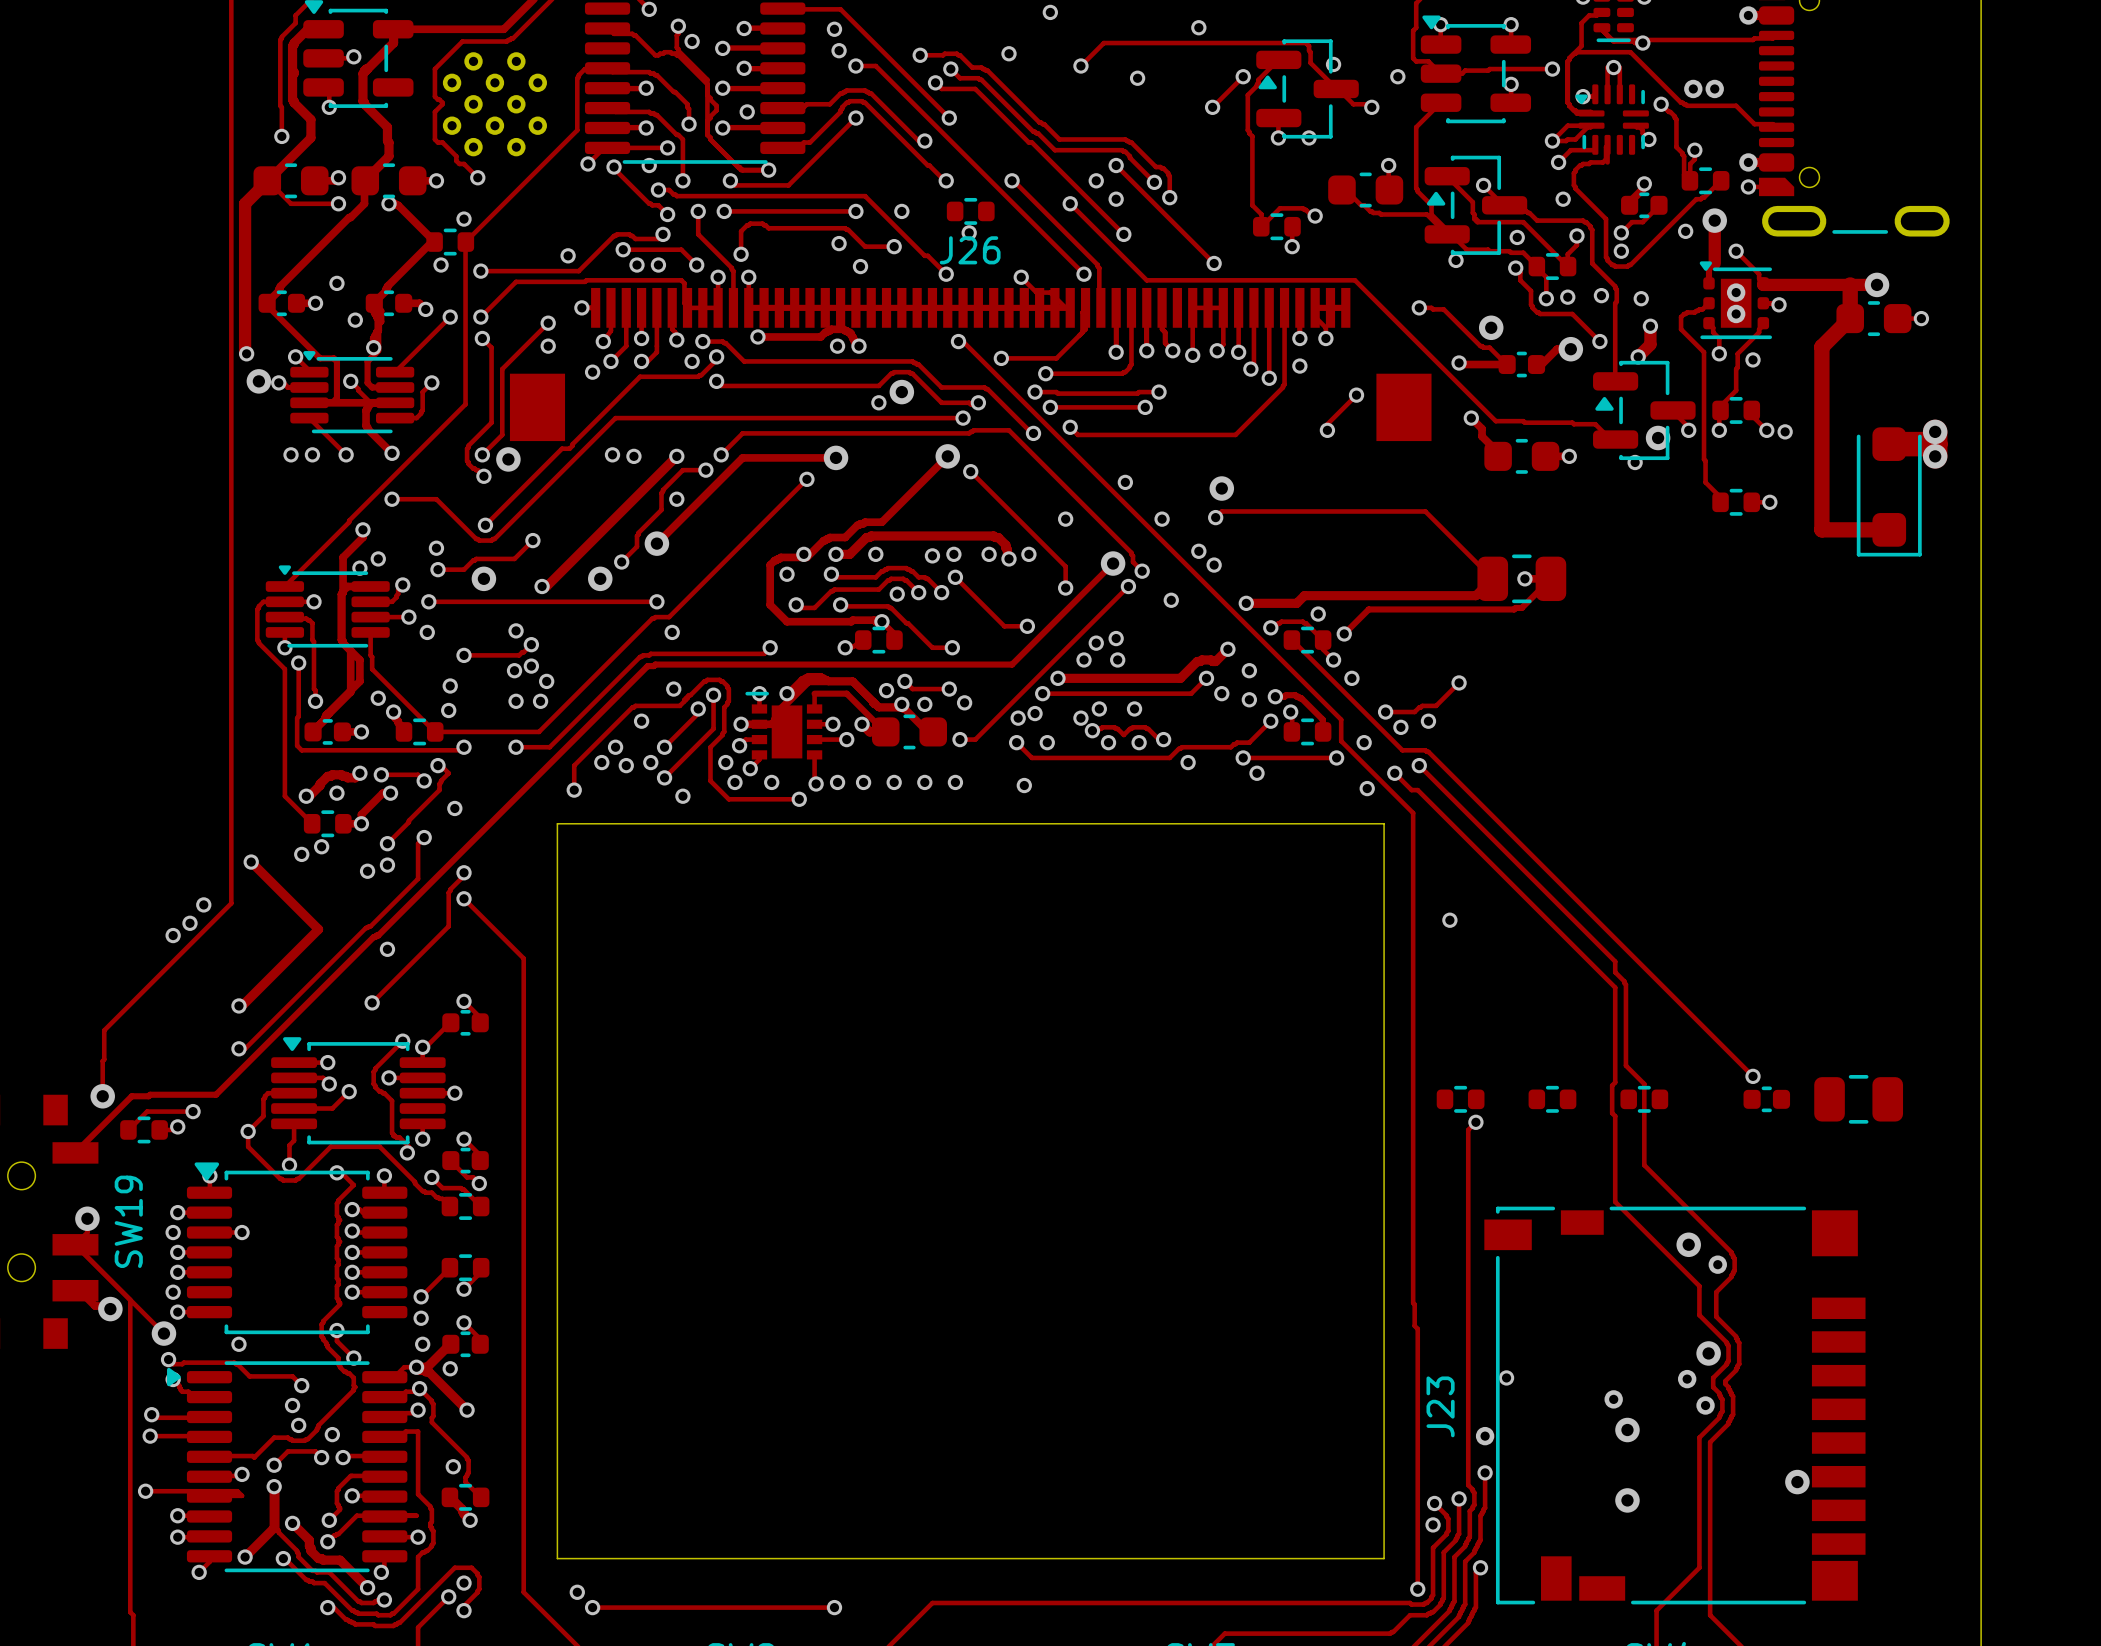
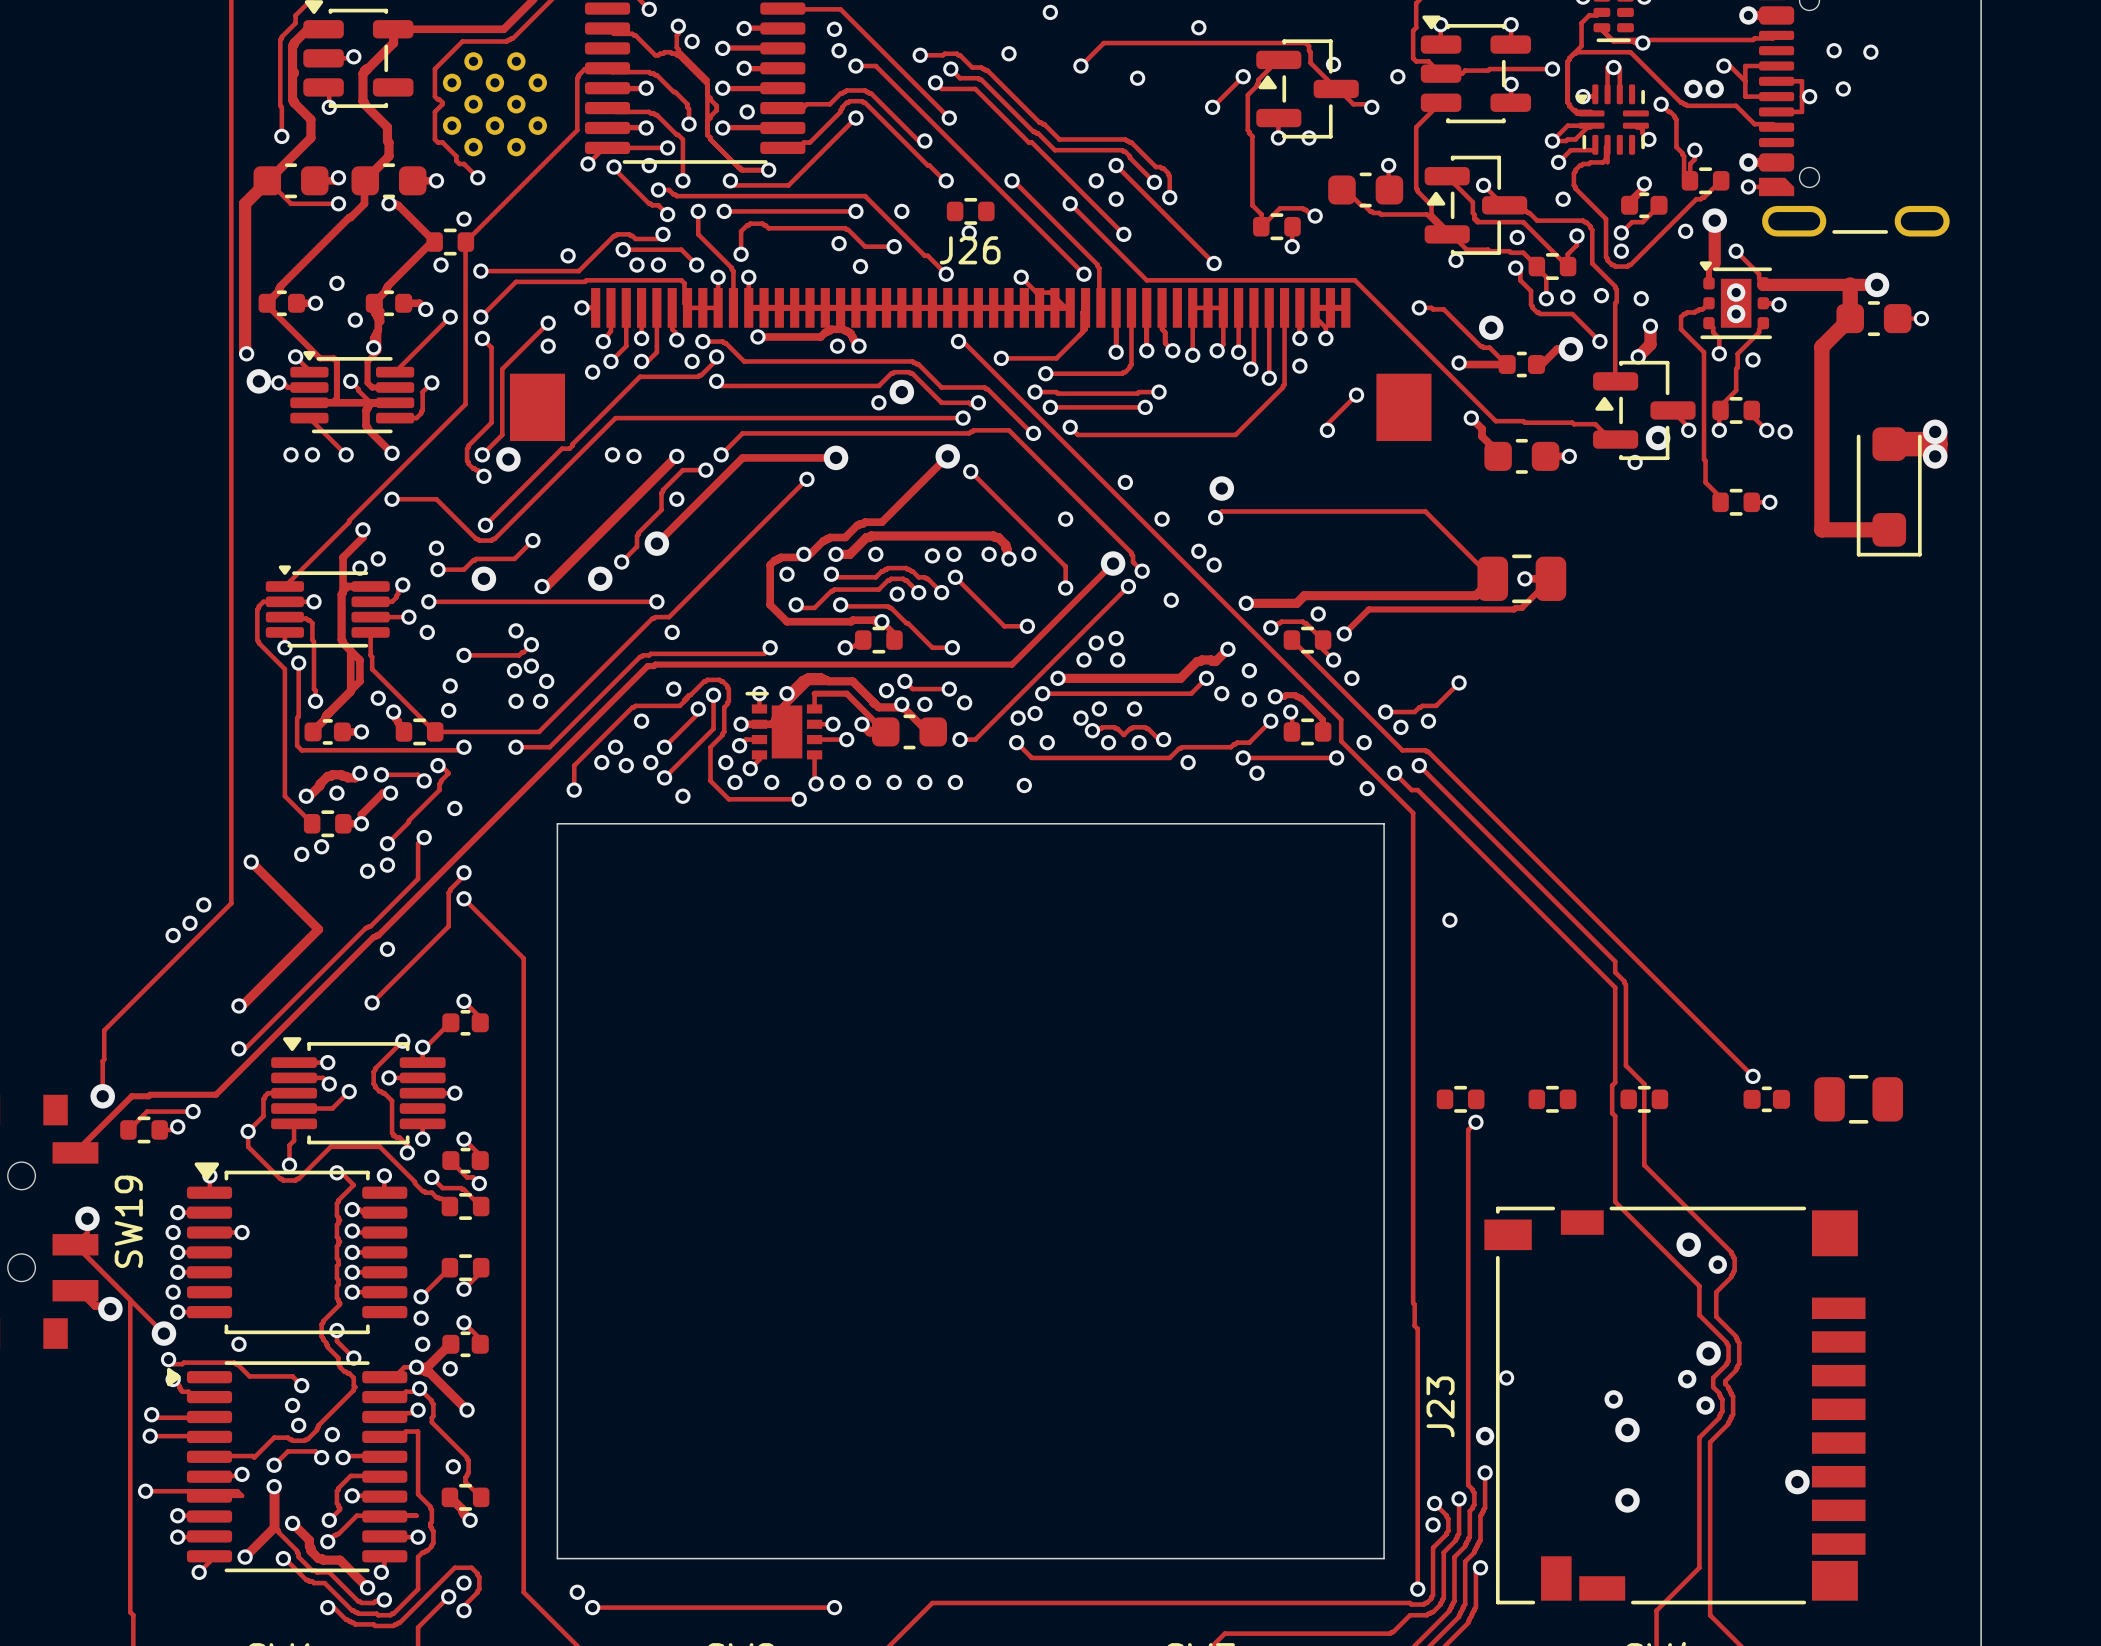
via: none -> (1834, 50)
via: none -> (1870, 52)
track: none -> (1723, 66) (1730, 66) (1745, 81)
via: none -> (1723, 66)
track: none -> (1776, 66) (1745, 66) (1745, 96) (1776, 96)
track: none -> (1776, 81) (1801, 81) (1801, 111) (1776, 111)
via: none -> (1843, 88)
via: none -> (1809, 96)

